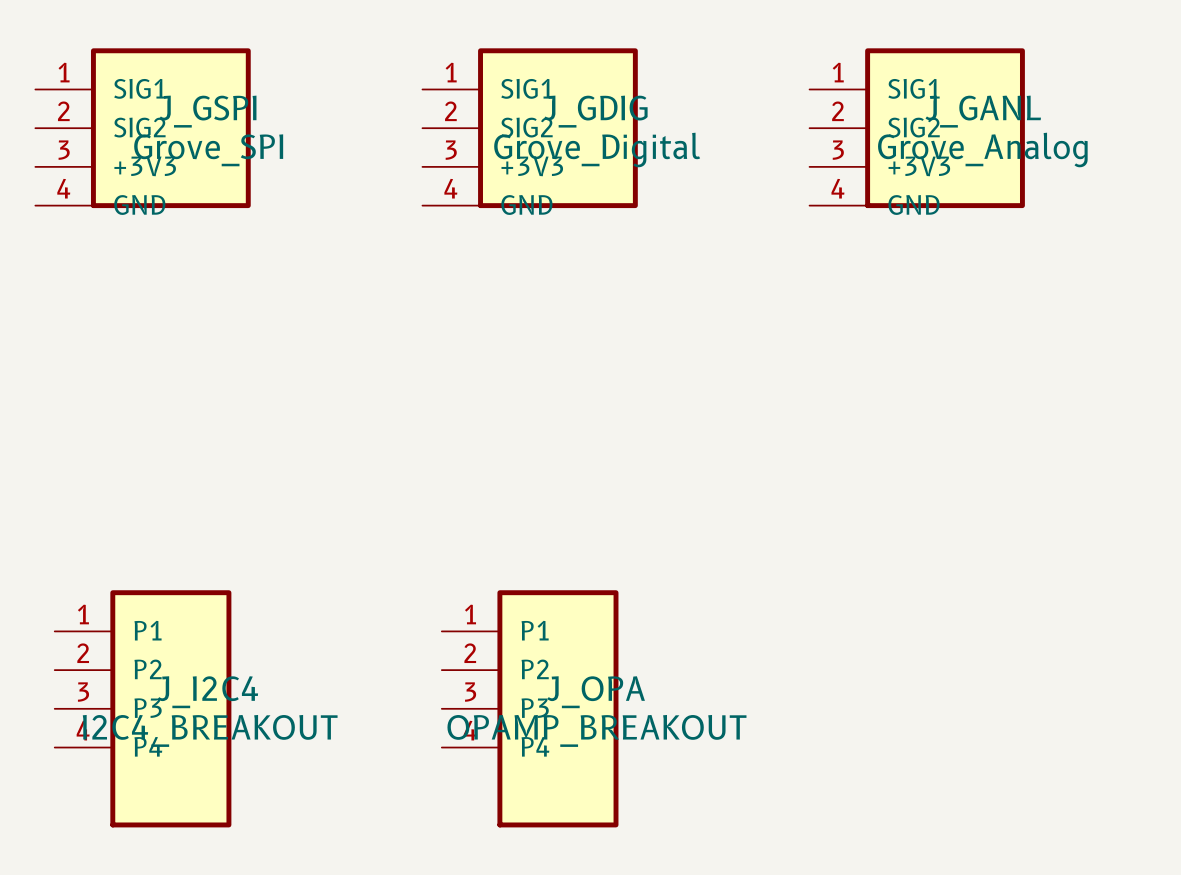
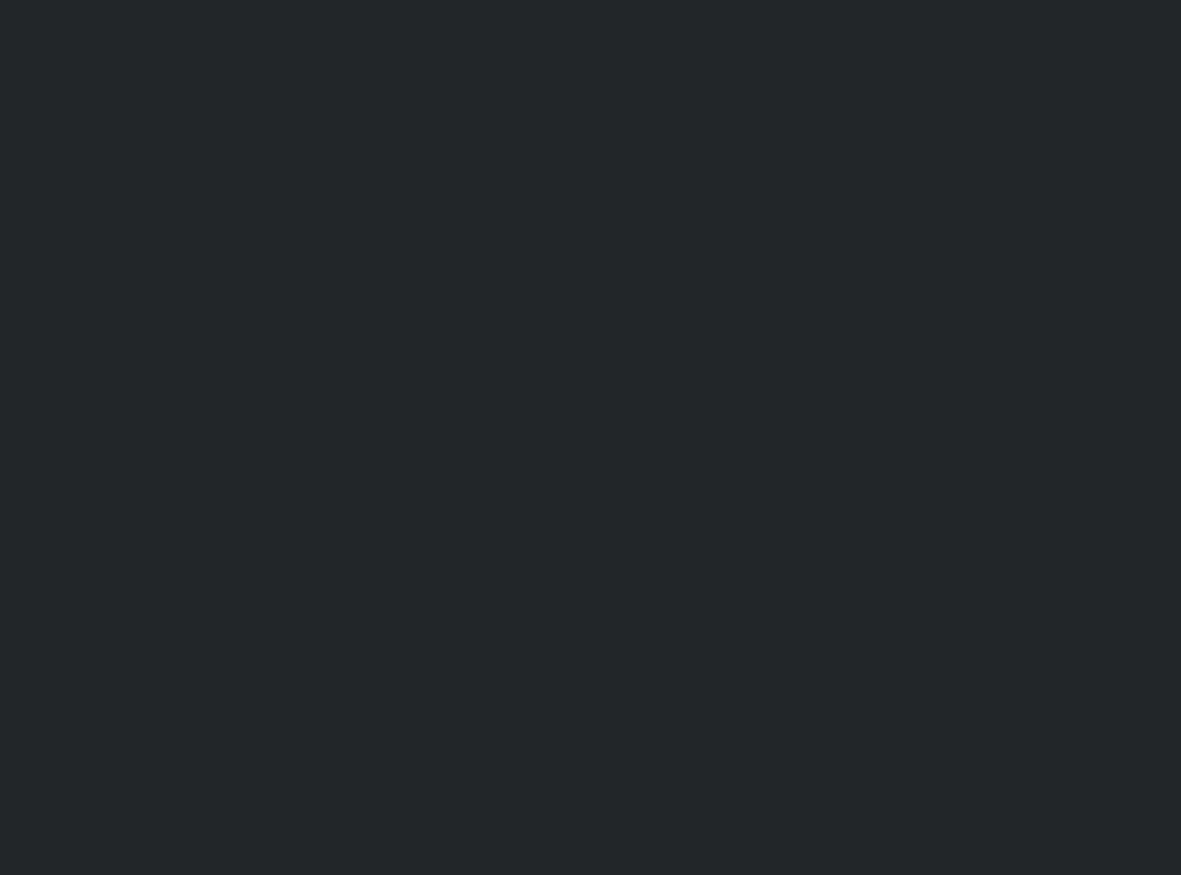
J_GSPI: Grove_SPI (143, 128) -> none
J_GDIG: Grove_Digital (530, 128) -> none
J_GANL: Grove_Analog (917, 128) -> none
J_I2C4: I2C4_BREAKOUT (143, 708) -> none
J_OPA: OPAMP_BREAKOUT (530, 708) -> none

